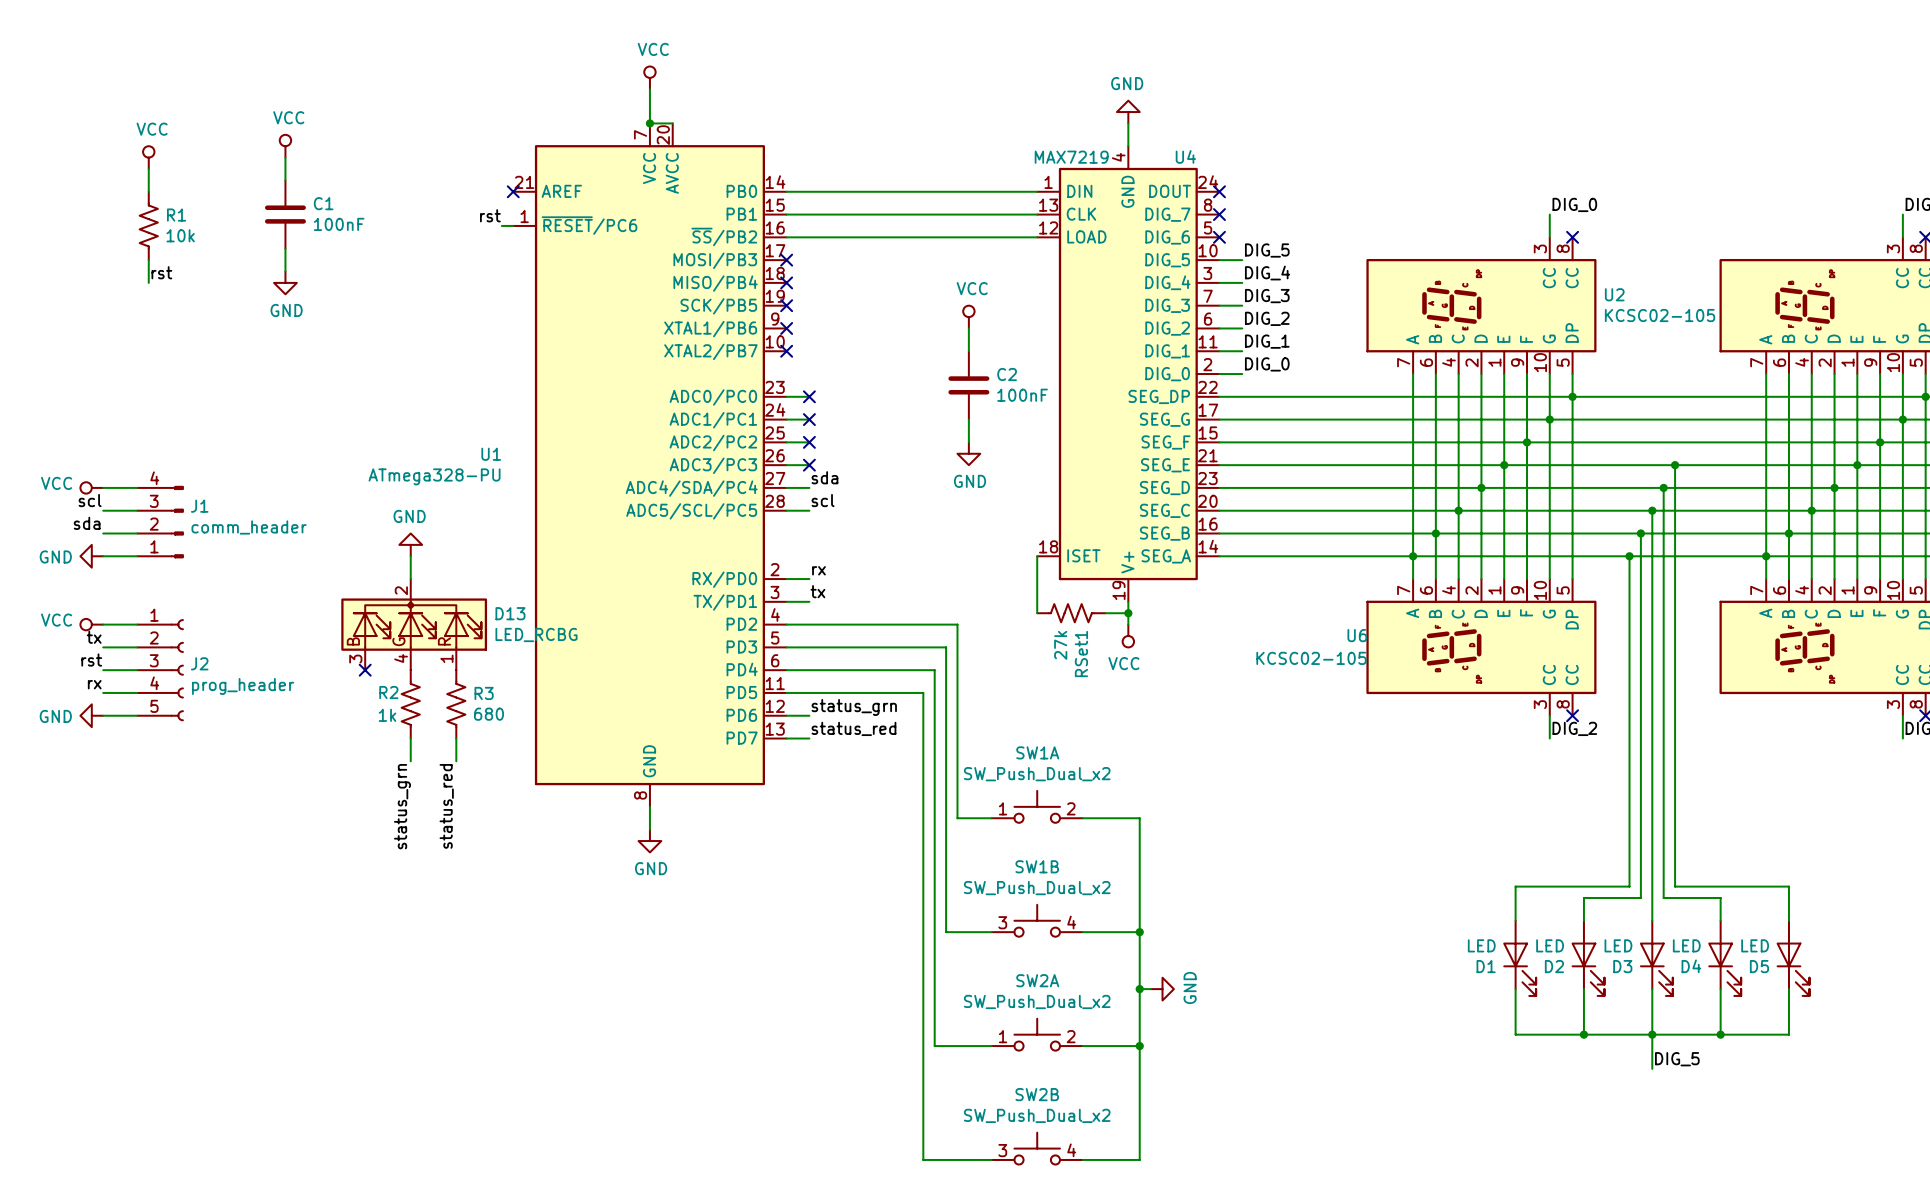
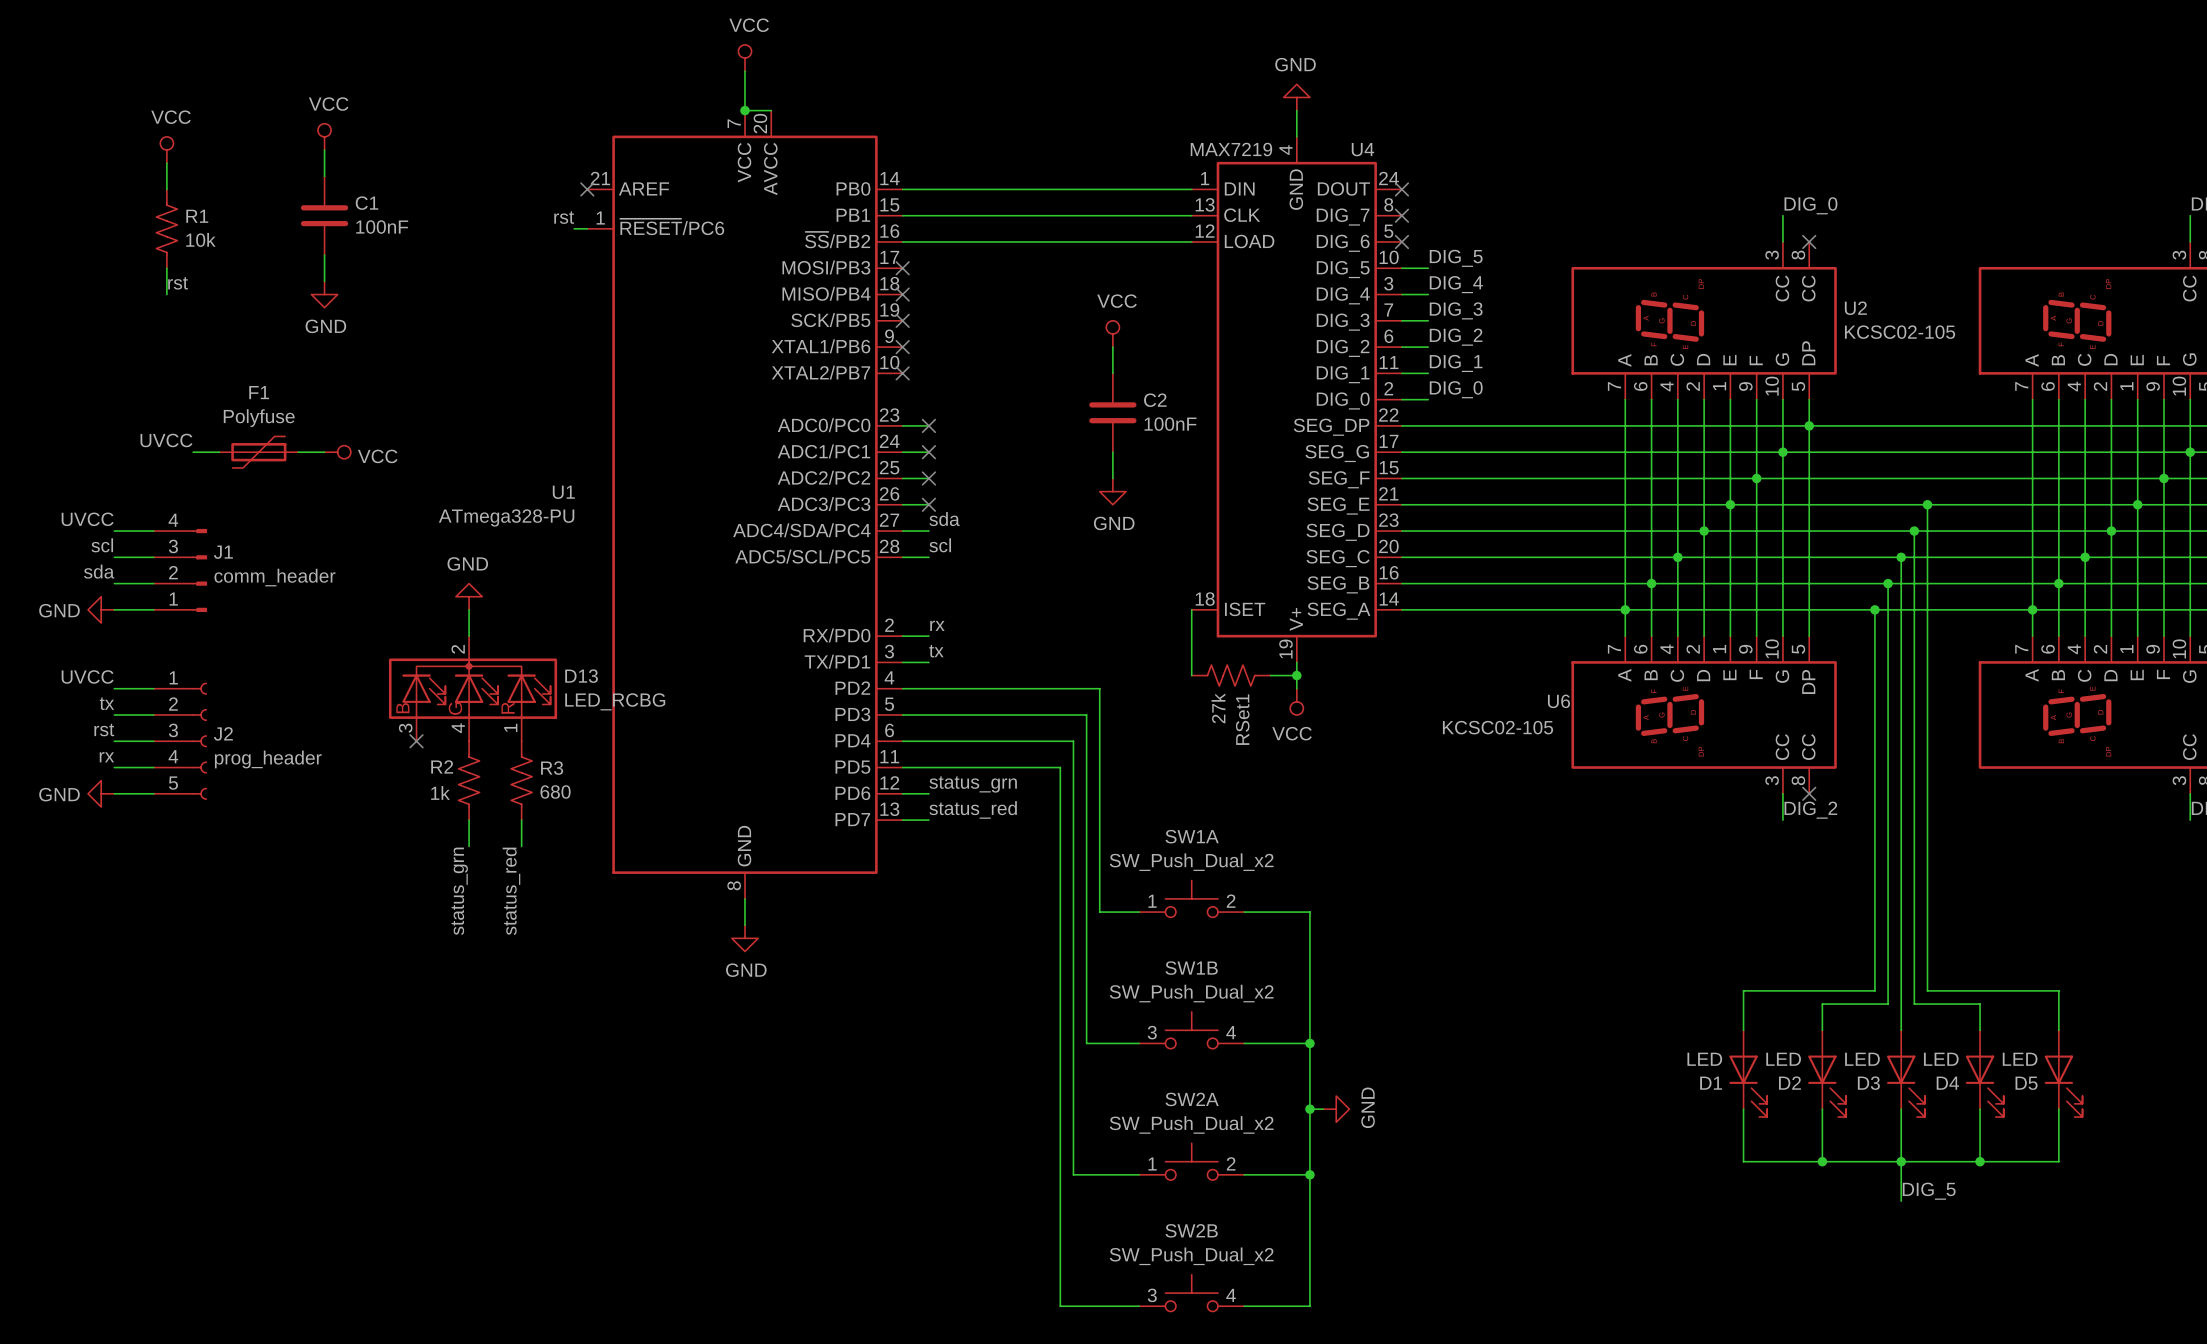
label: none -> UVCC (166, 440)
wire: none -> (193, 452) (219, 452)
F1: none -> Polyfuse (258, 452)
wire: none -> (298, 452) (324, 452)
power symbol: none -> VCC (337, 452)
label: none -> UVCC (87, 519)
power symbol: VCC (91, 487) -> none
label: none -> UVCC (87, 676)
power symbol: VCC (91, 624) -> none

